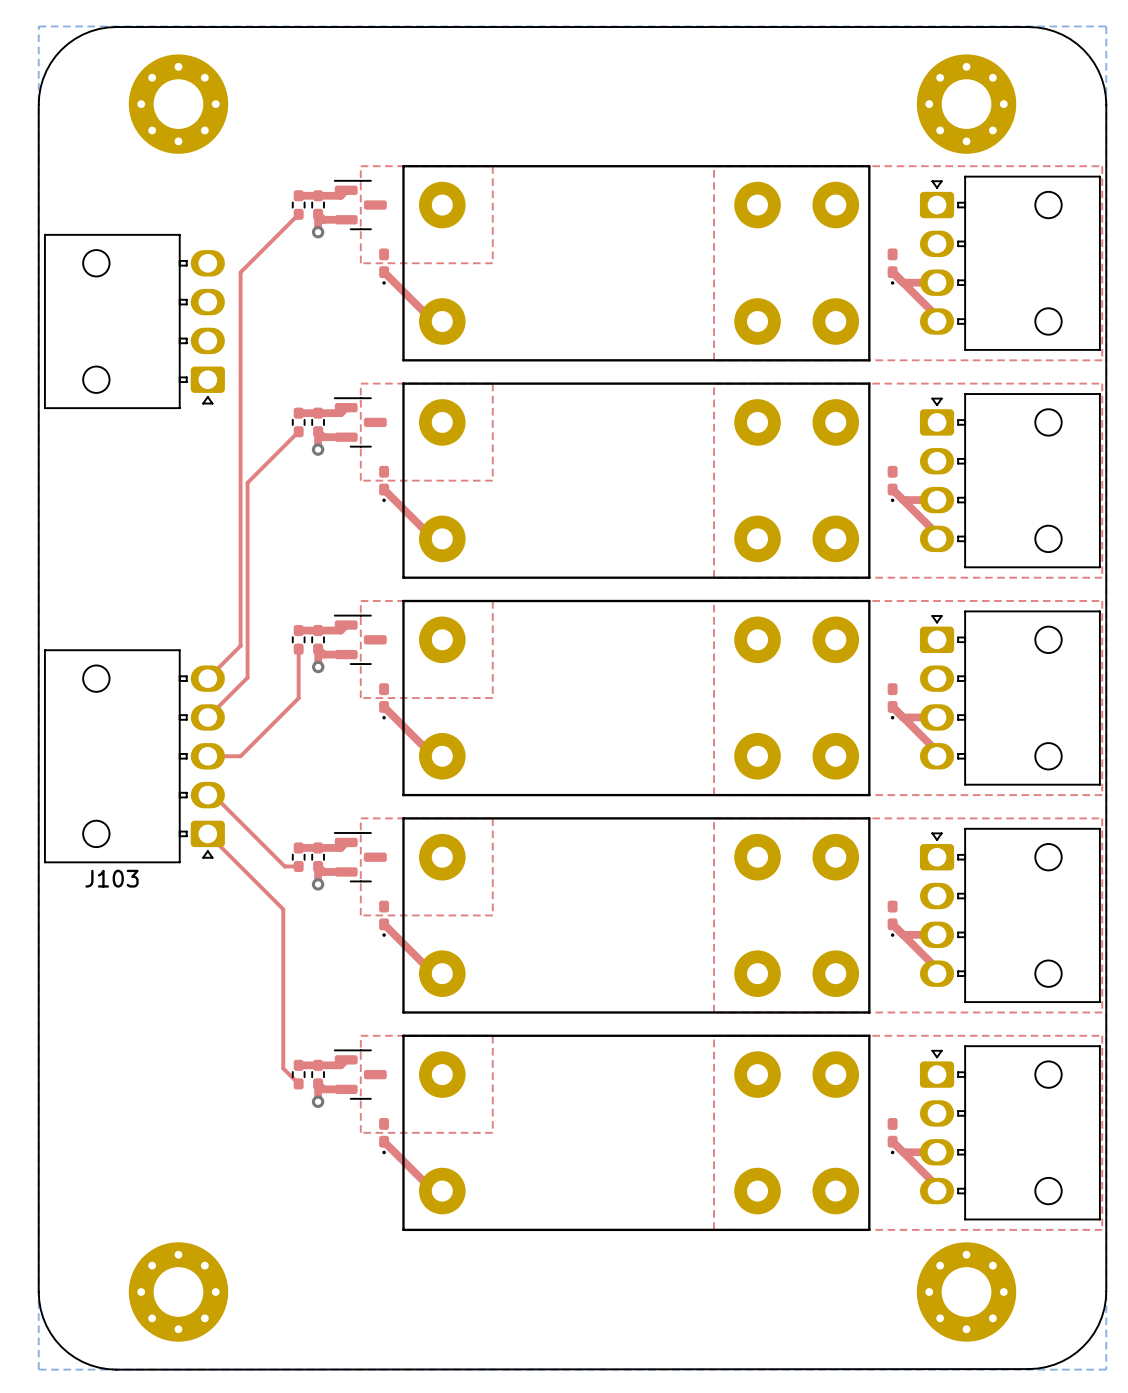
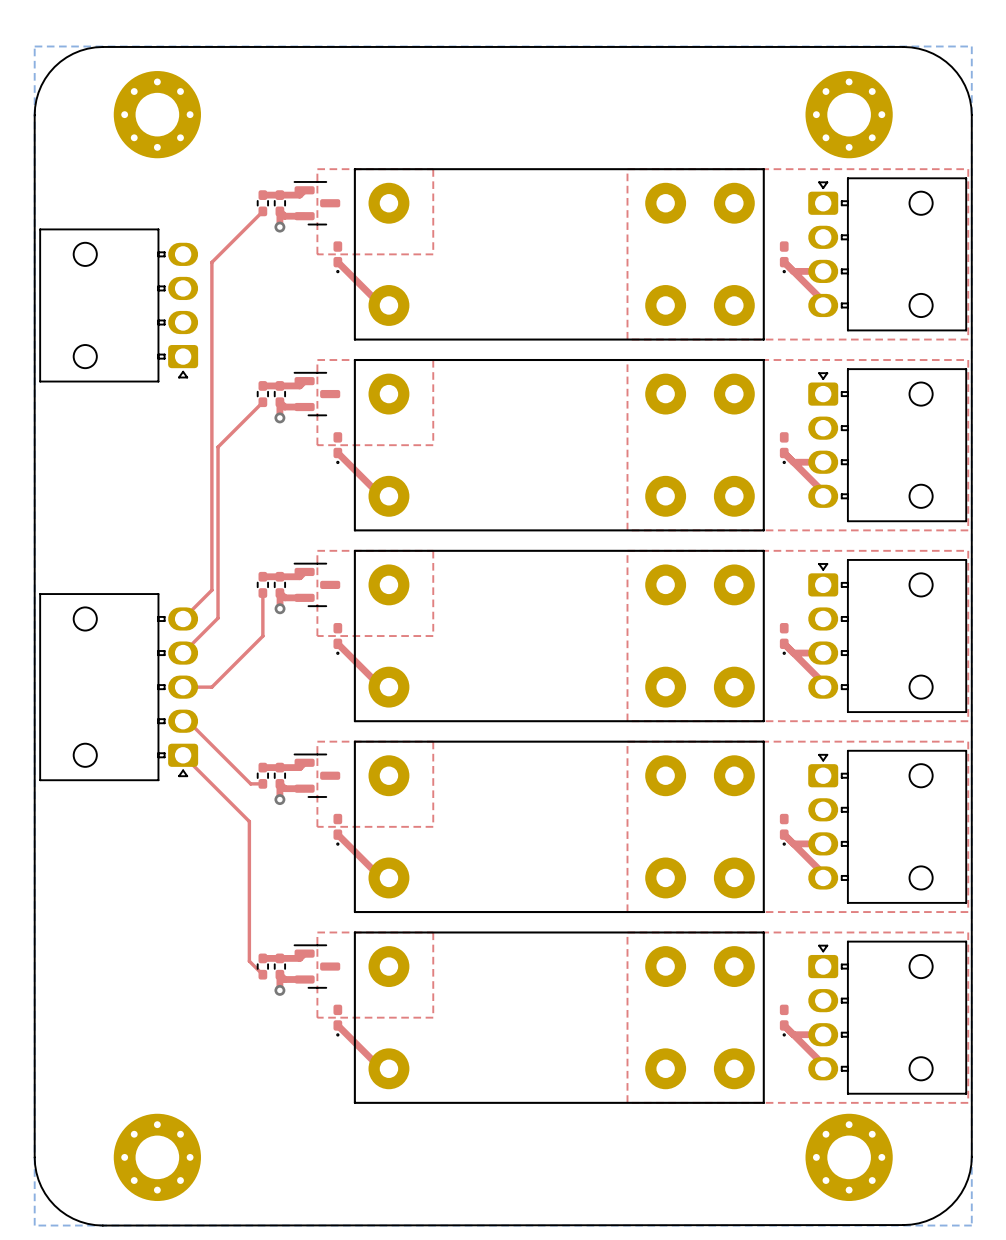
J103 name: J103 (111, 878) -> none

